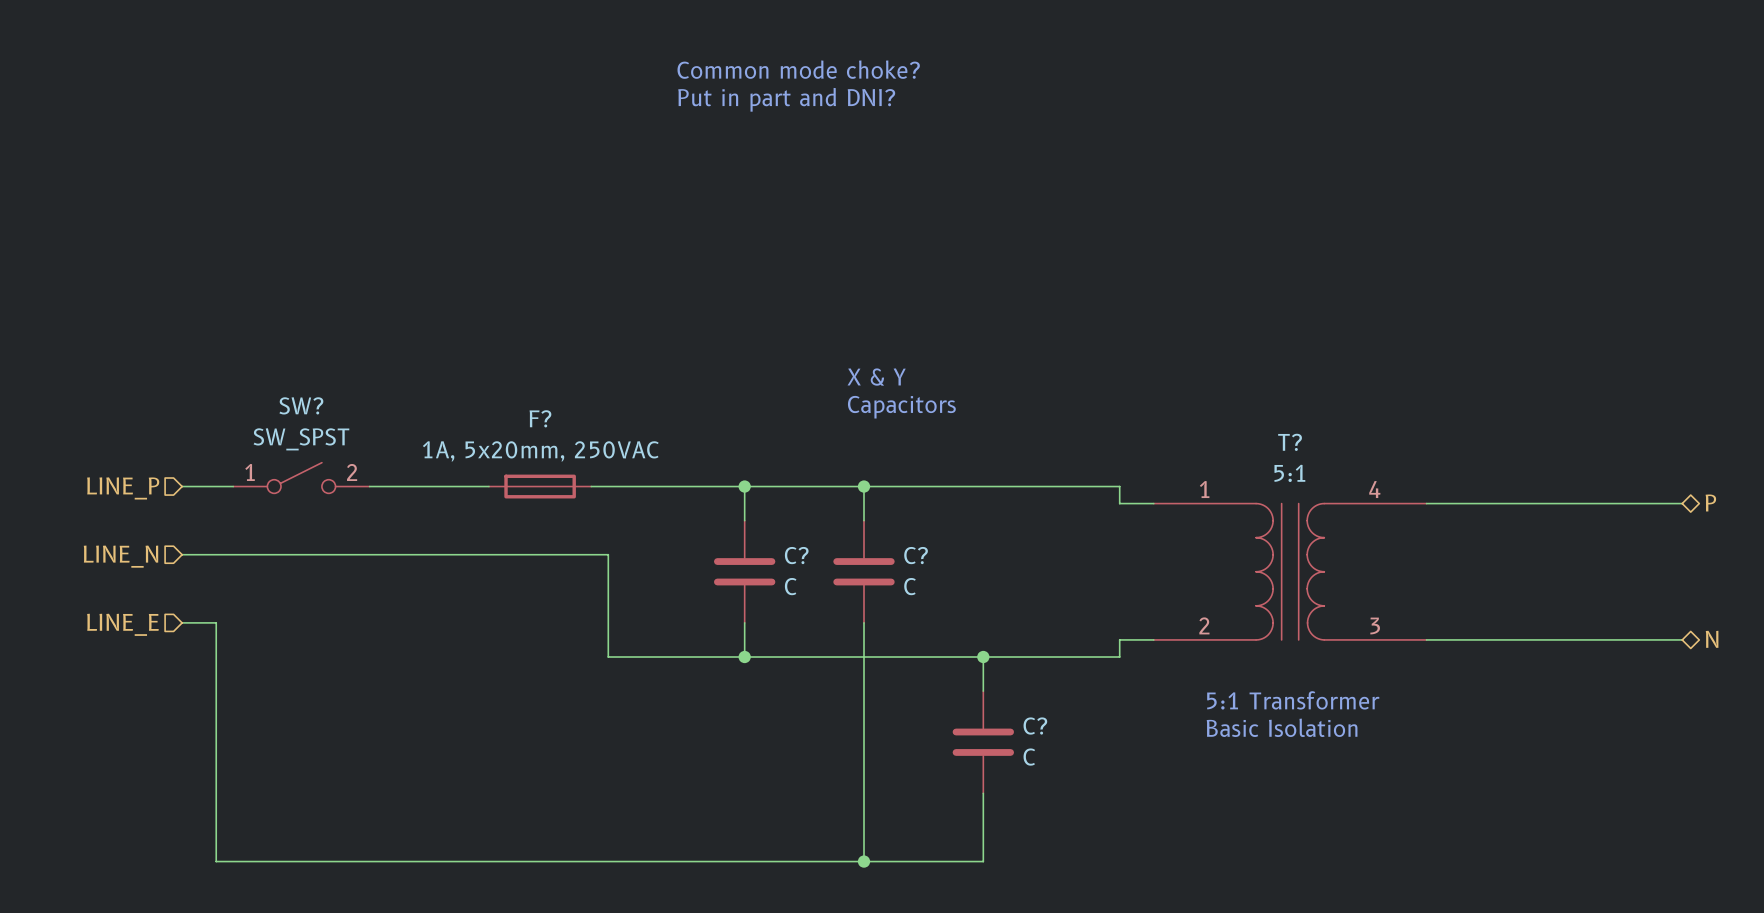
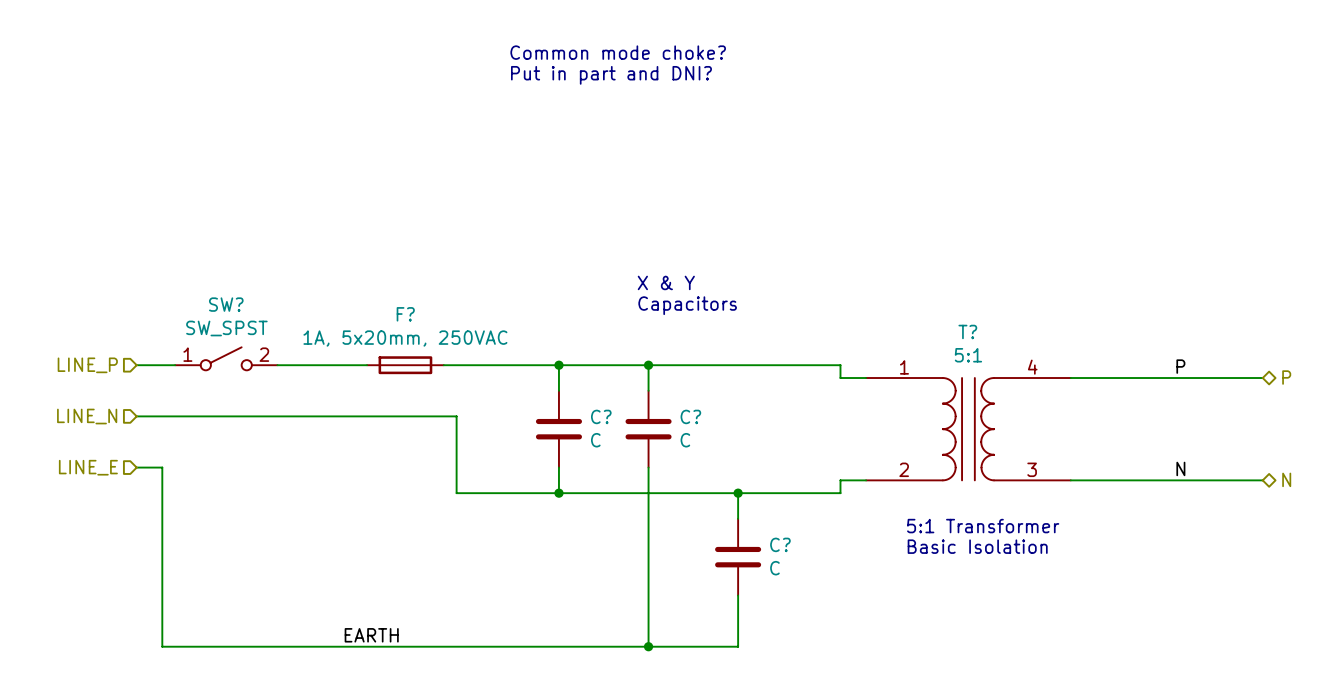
label: none -> P (1180, 366)
label: none -> N (1180, 468)
label: none -> EARTH (371, 635)

